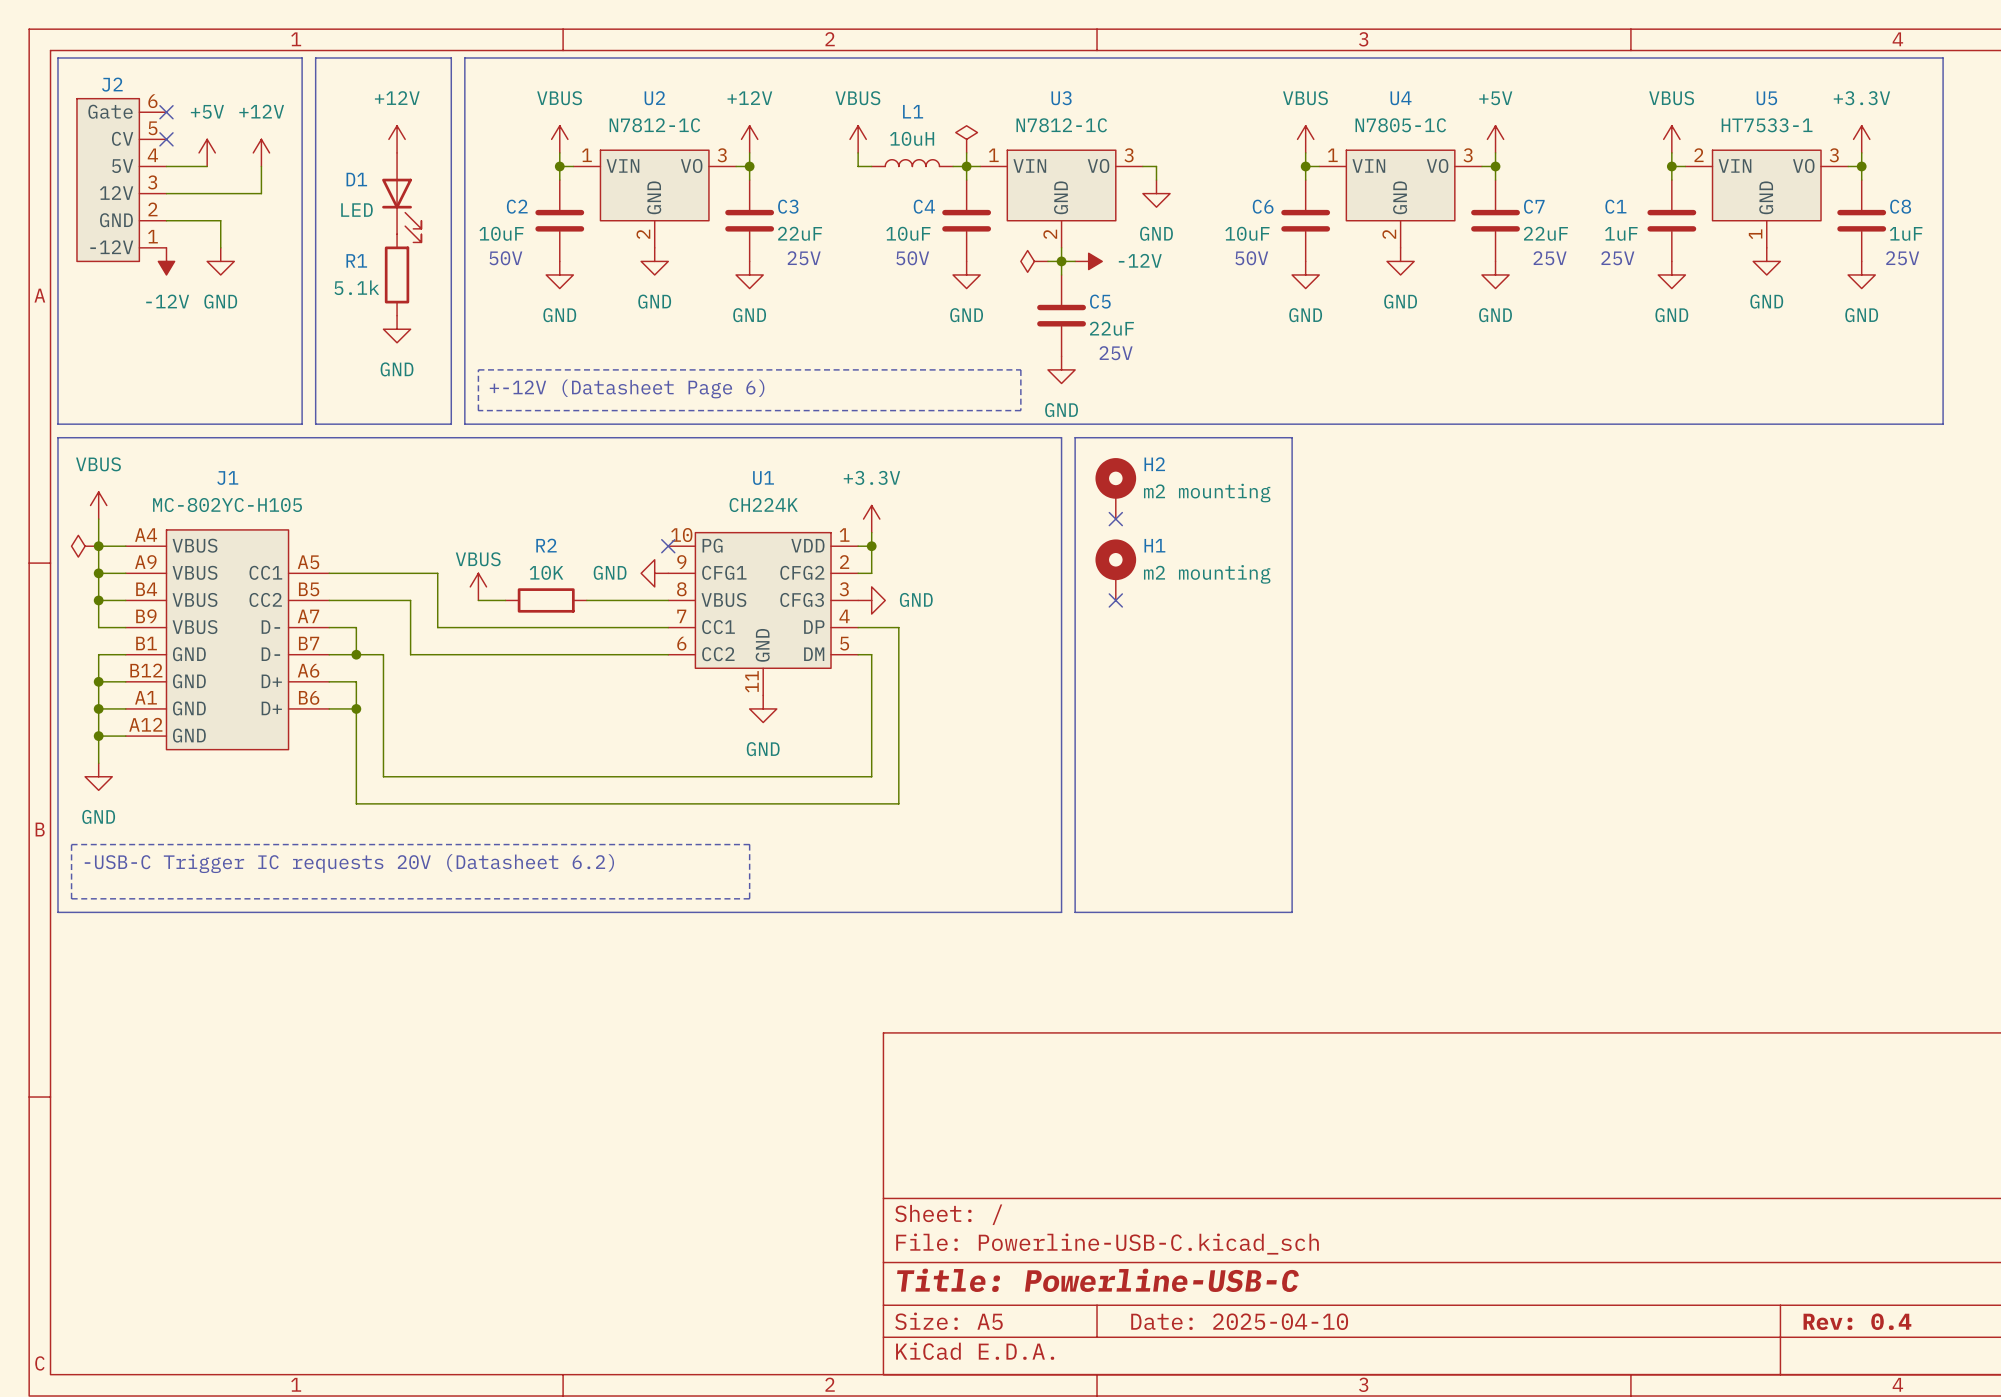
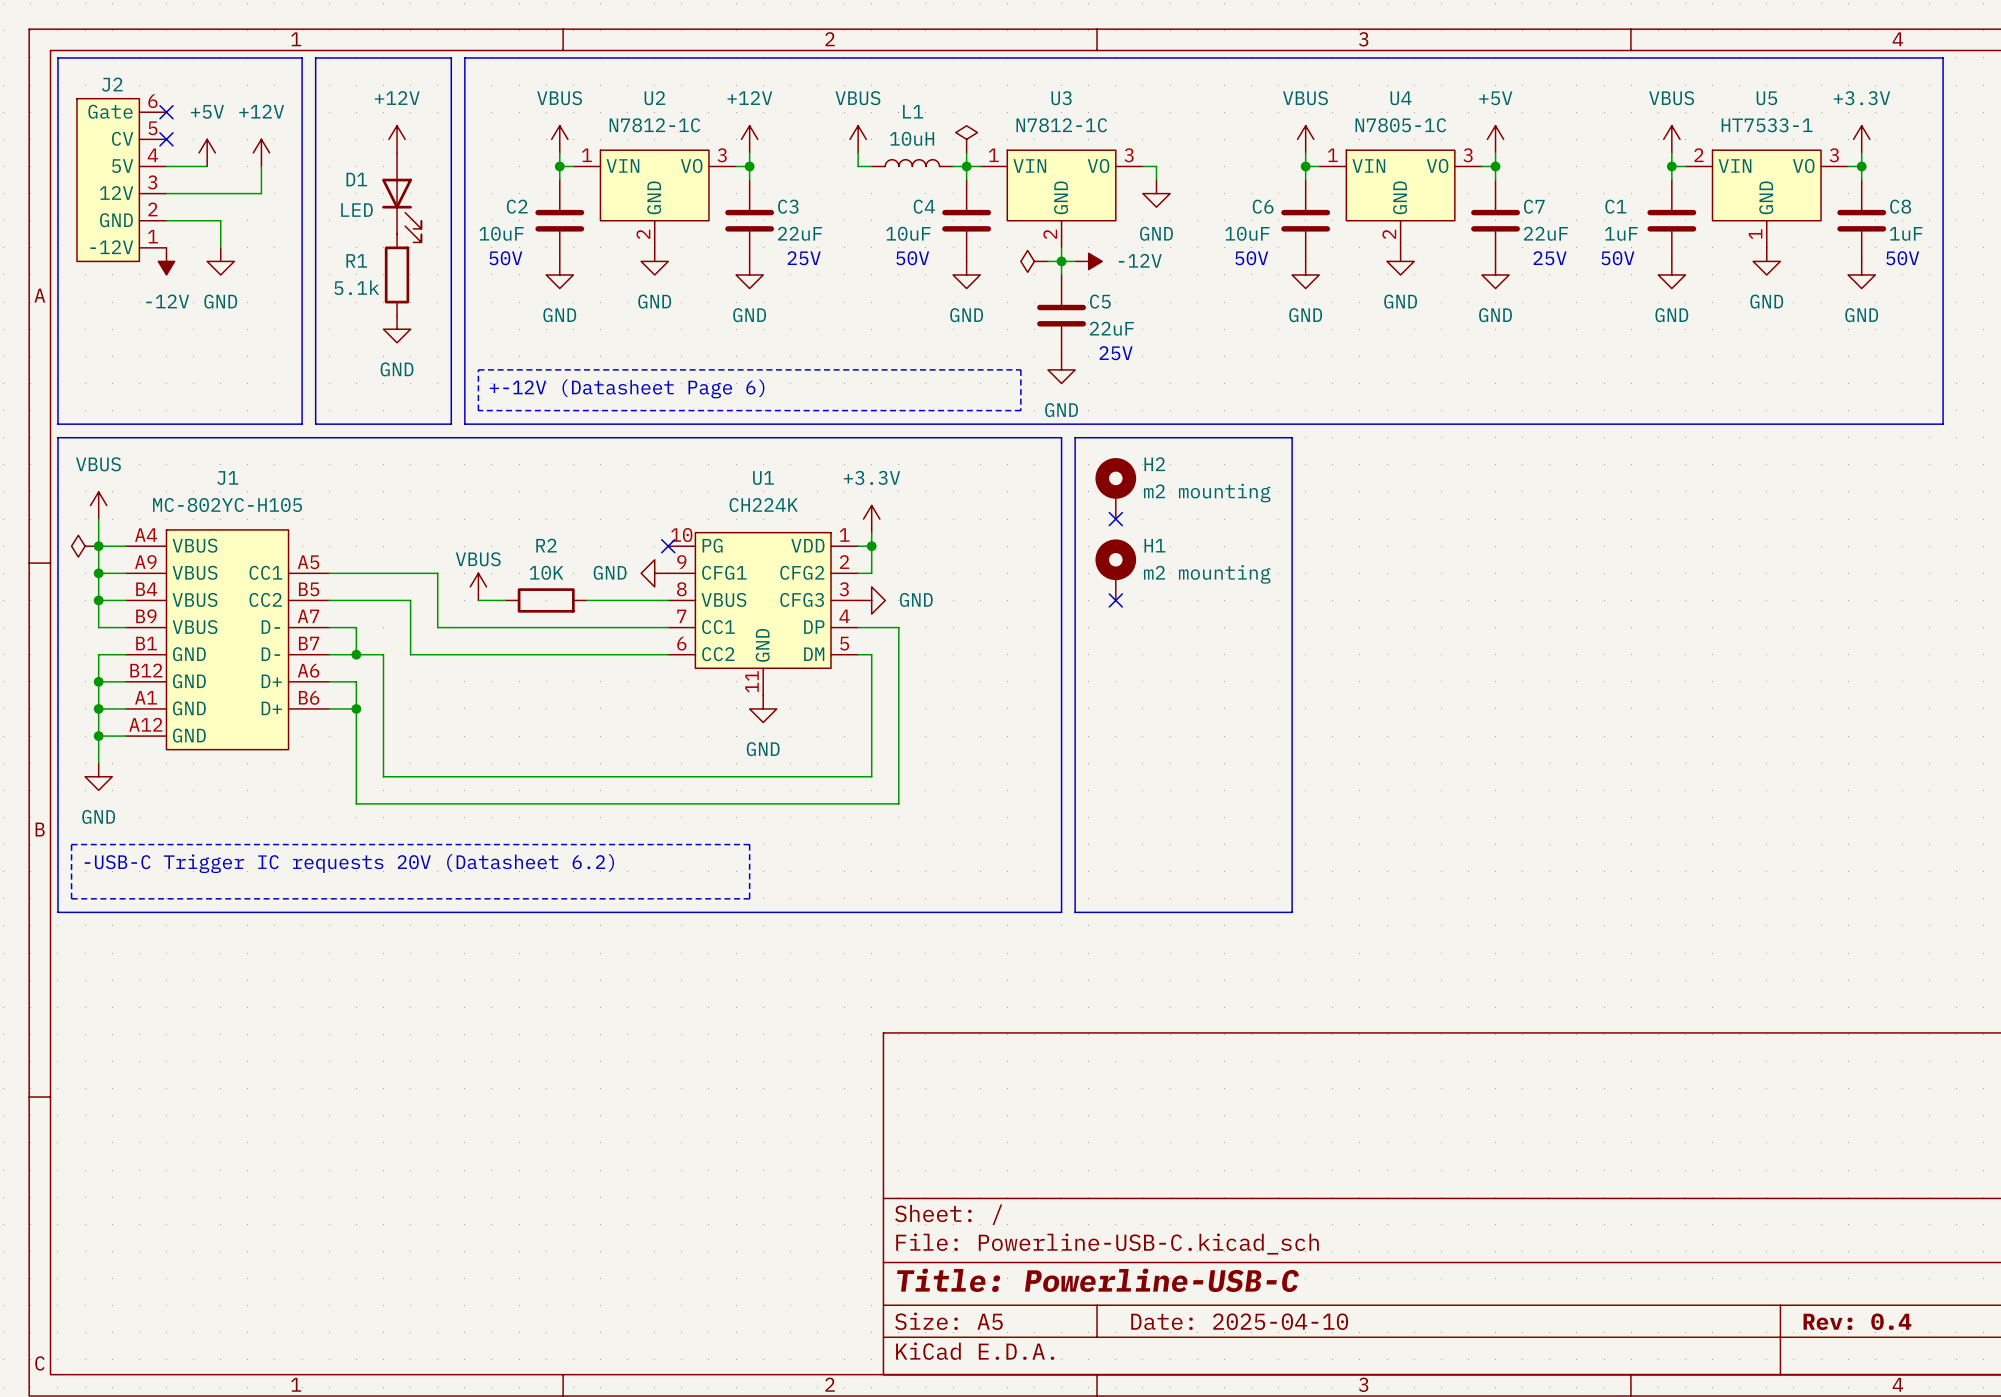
text: 25V (1617, 258) -> 50V (1617, 258)
text: 25V (1902, 258) -> 50V (1902, 258)

